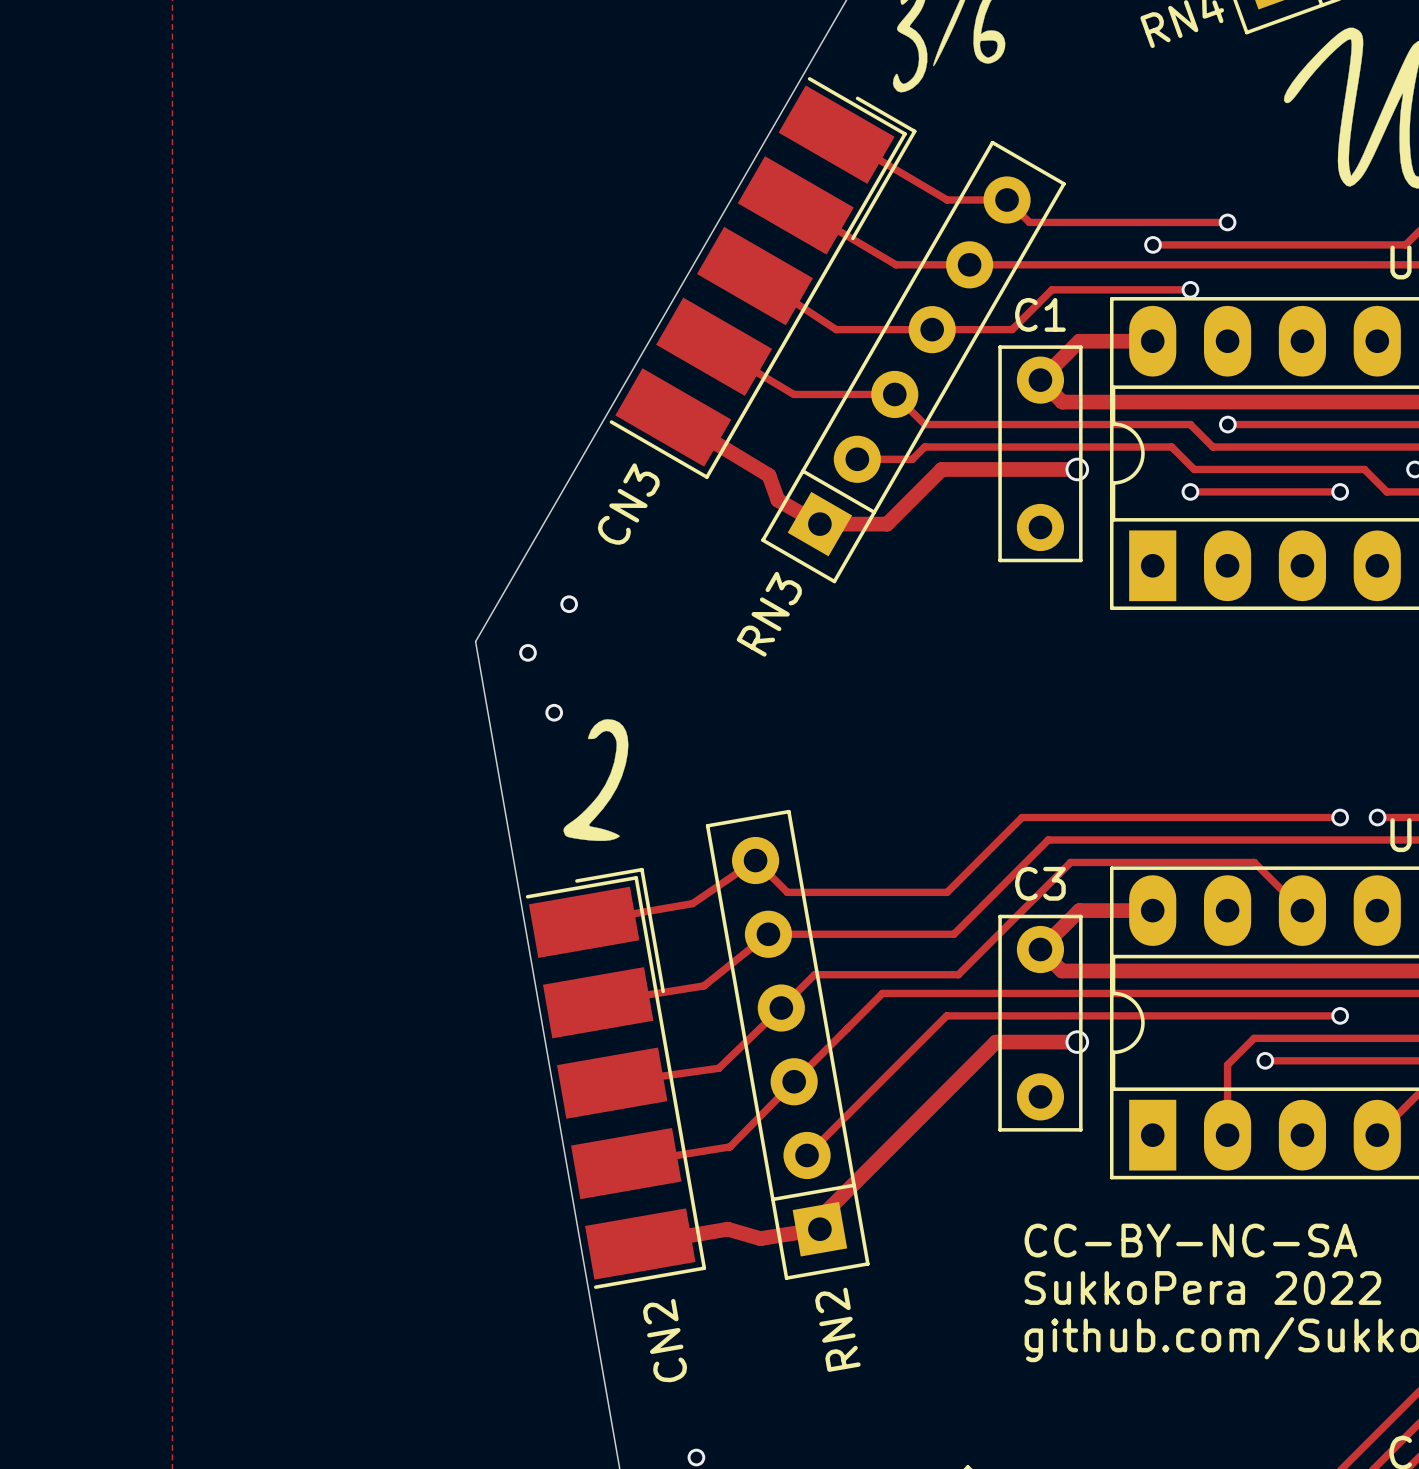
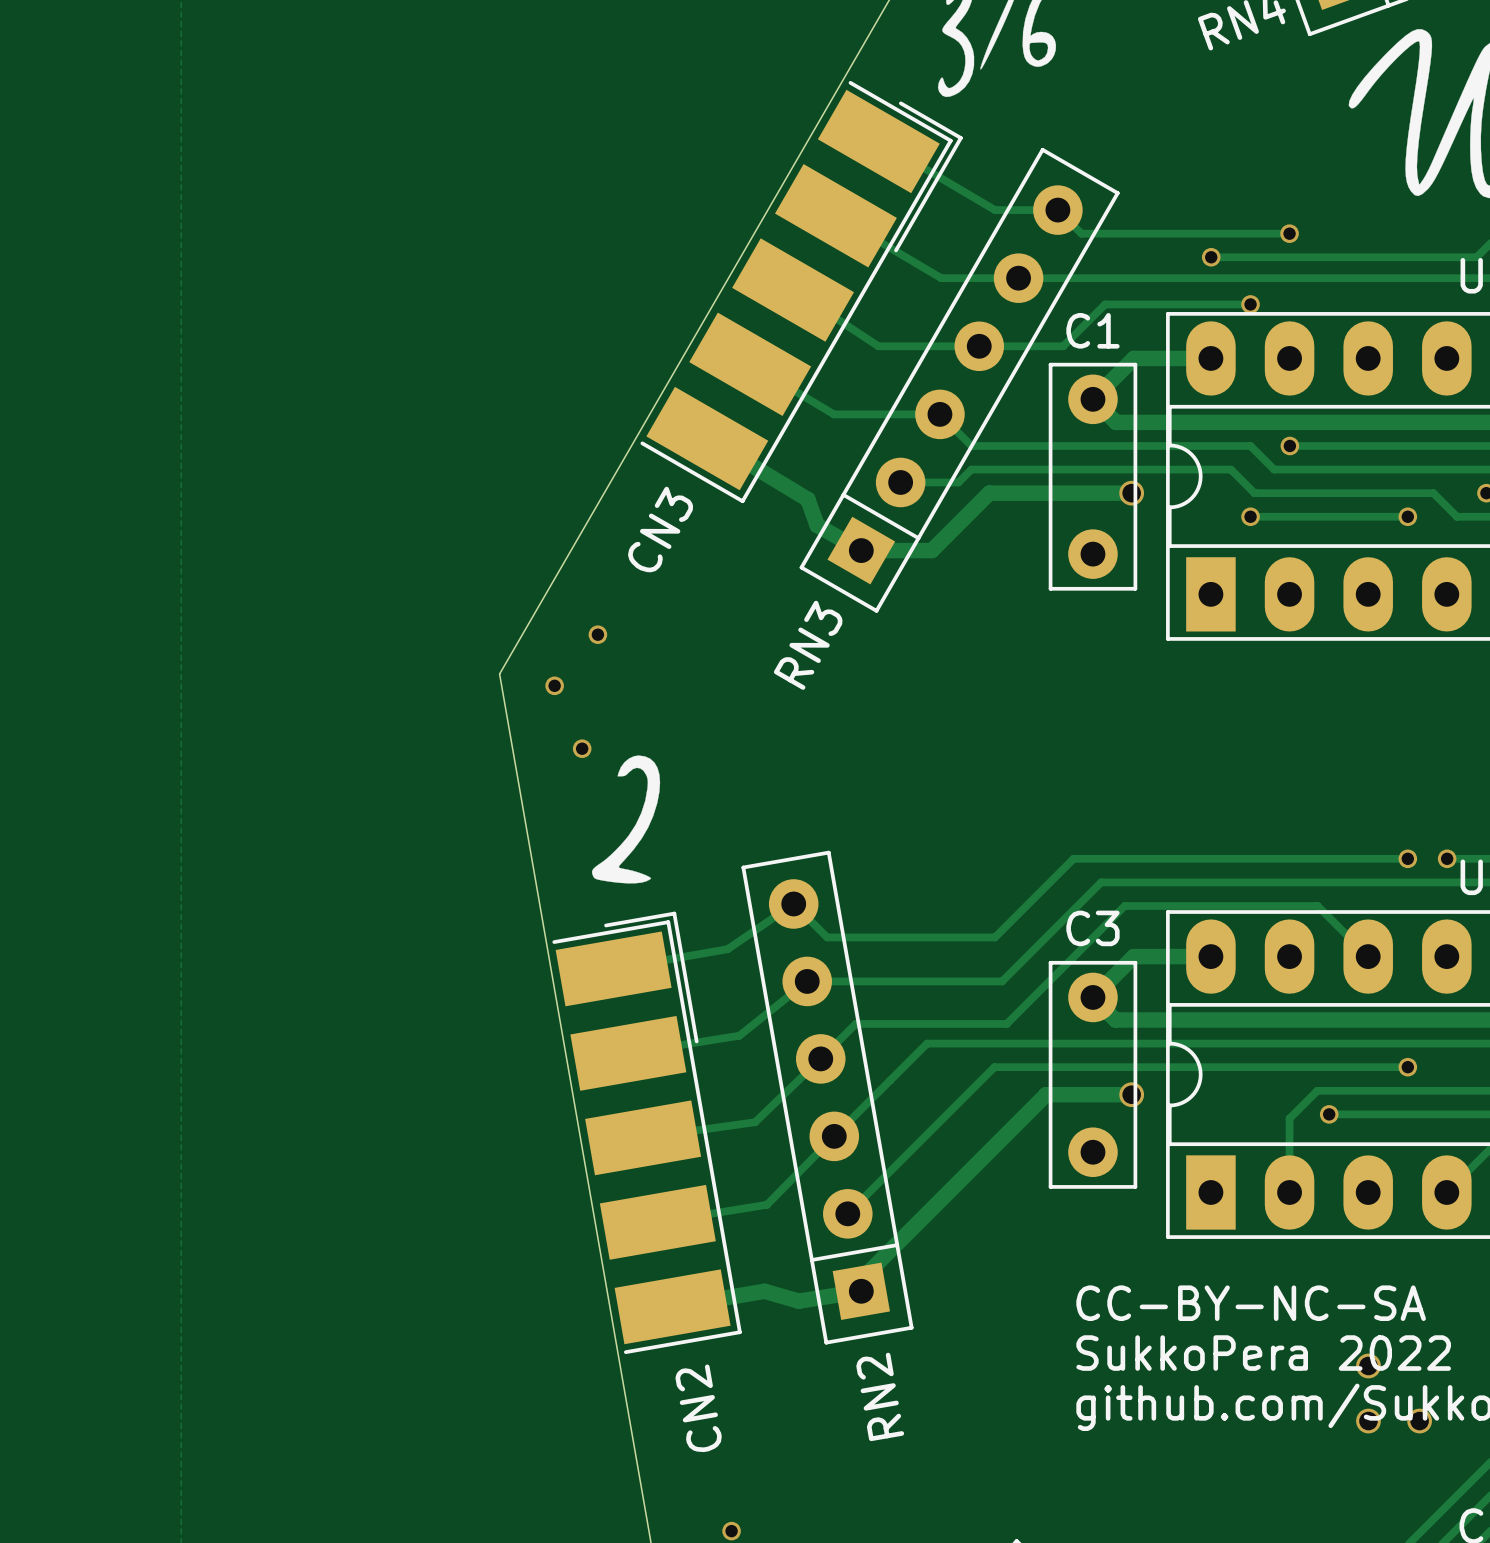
via: none -> (1368, 1365)
via: none -> (1368, 1421)
via: none -> (1419, 1421)

